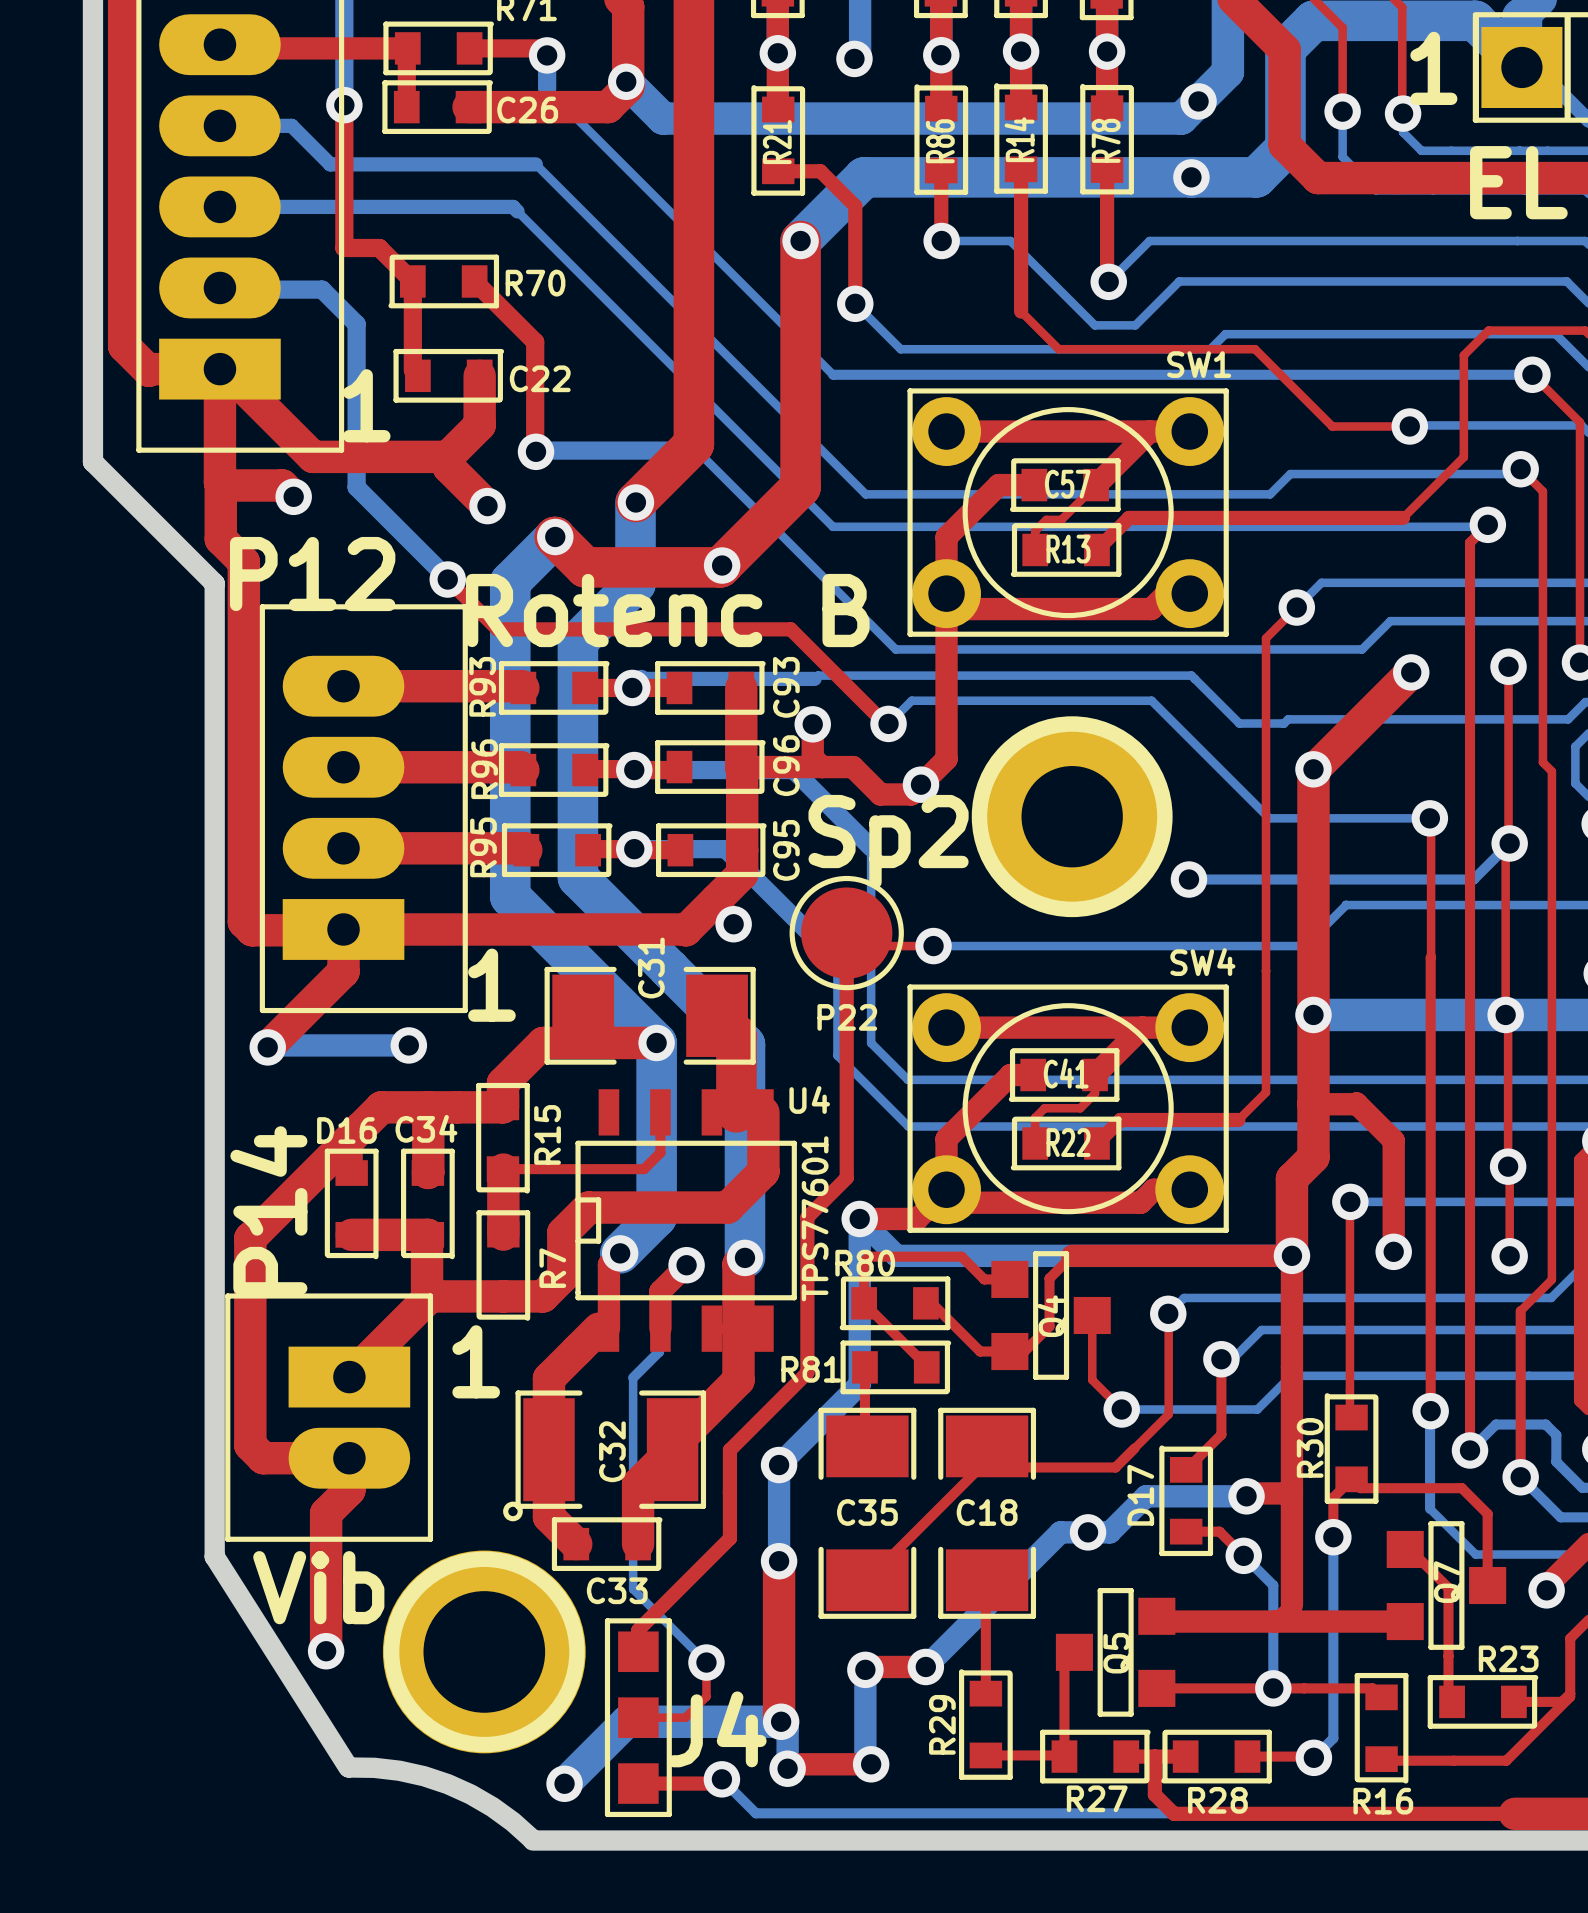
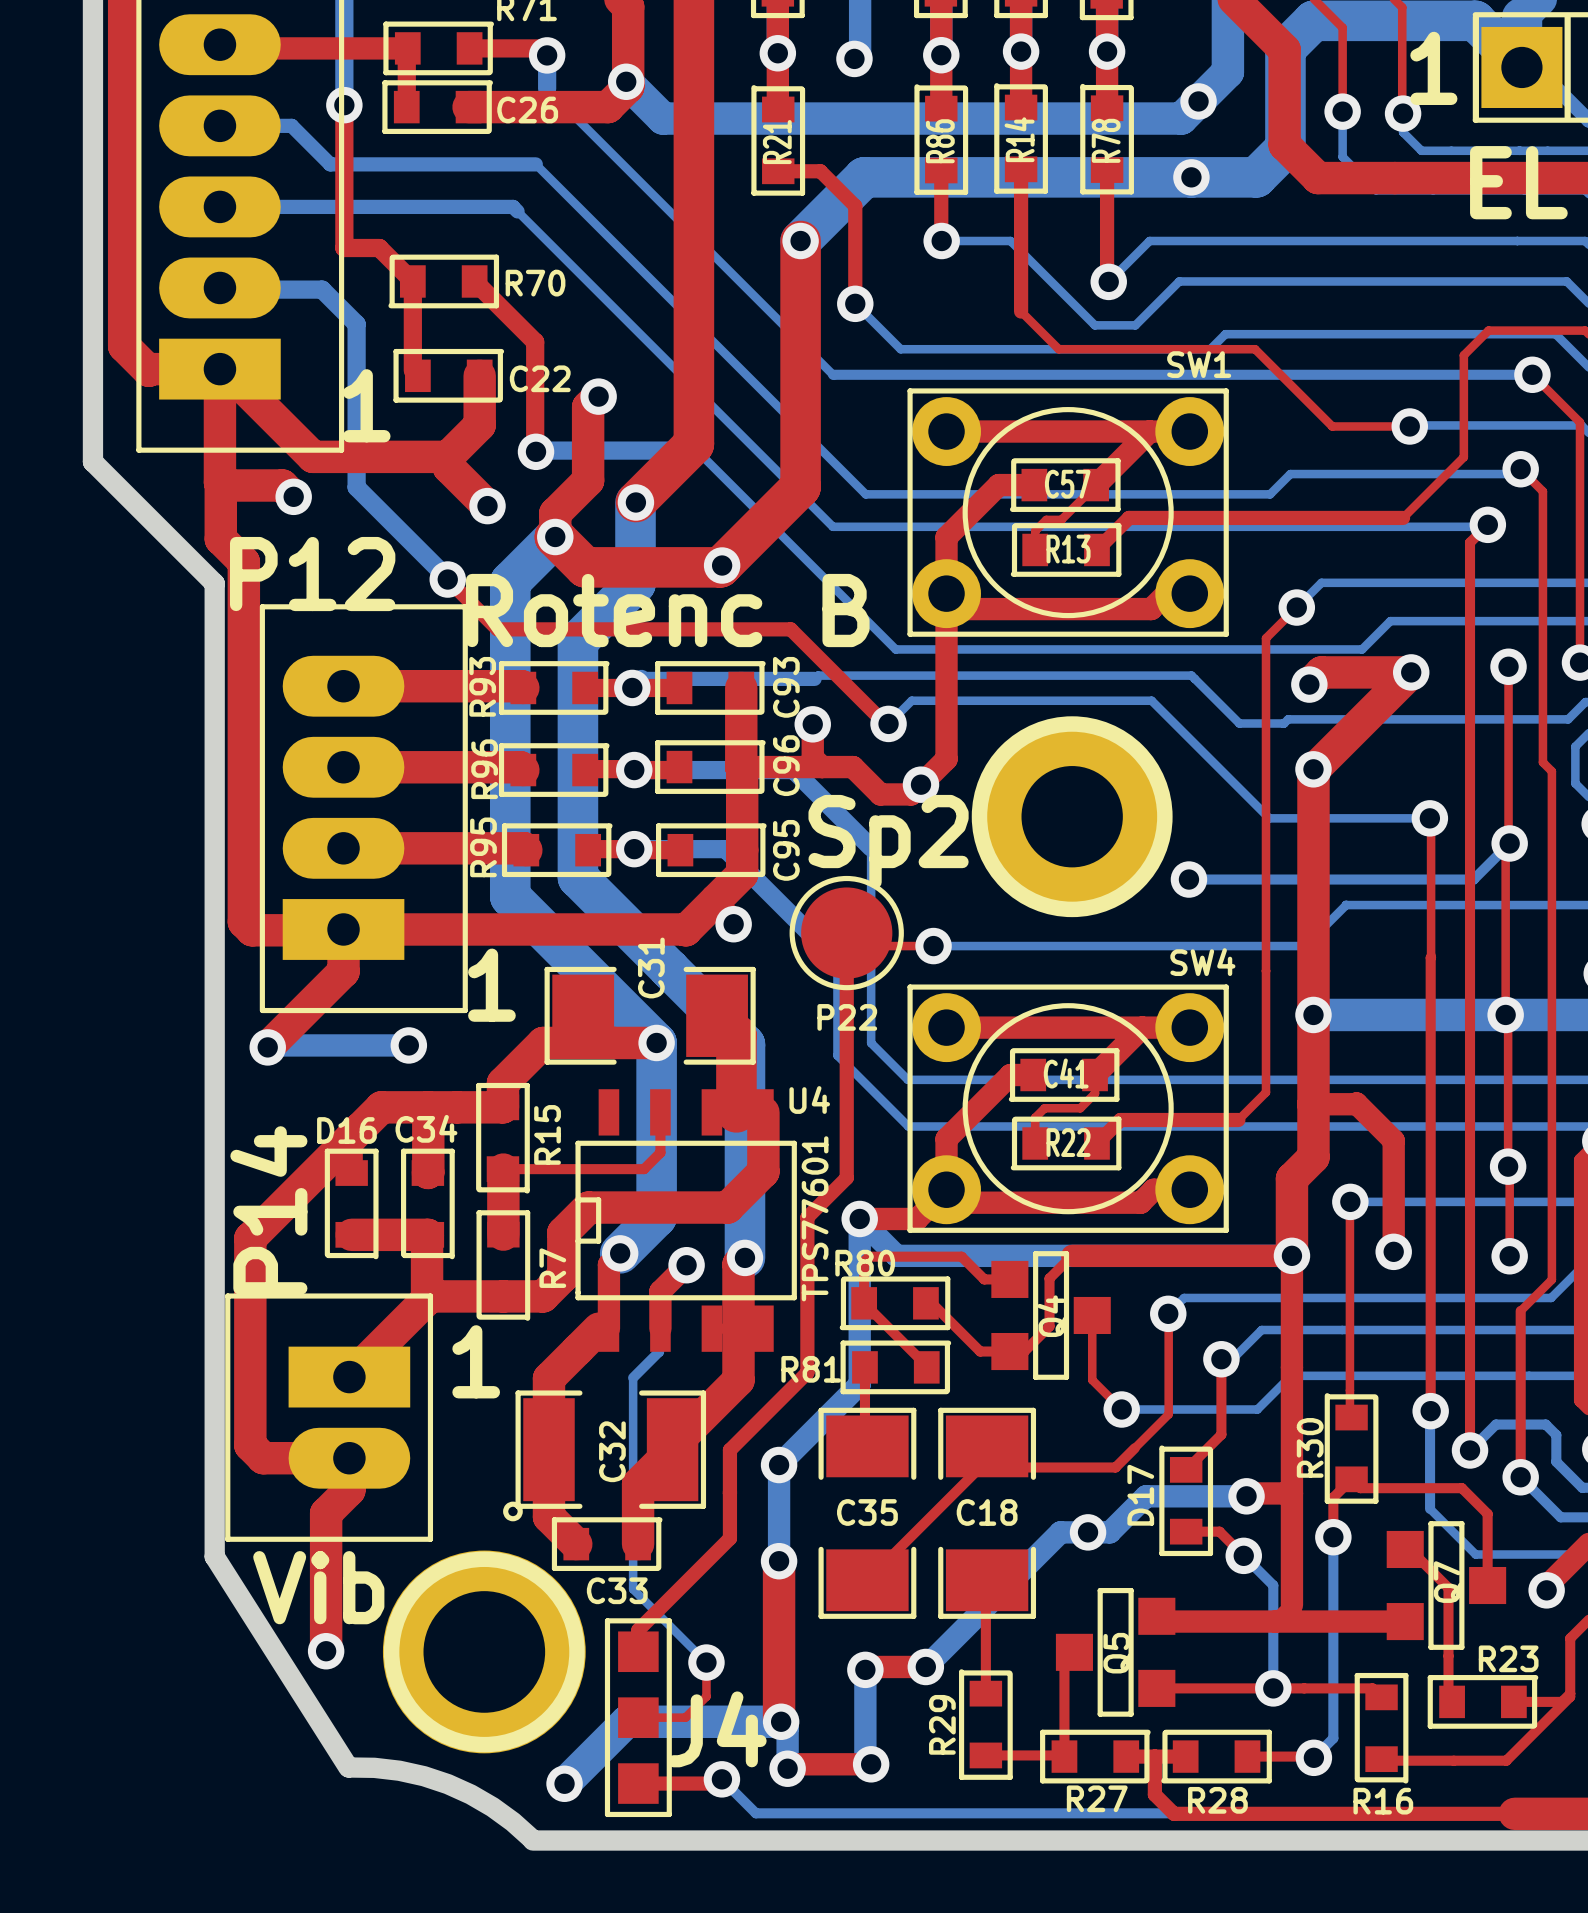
top track: none -> (598, 396) (588, 407) (588, 480) (555, 513) (555, 536)
via: none -> (598, 396)
top track: none -> (1411, 672) (1321, 672) (1309, 684)
via: none -> (1309, 684)

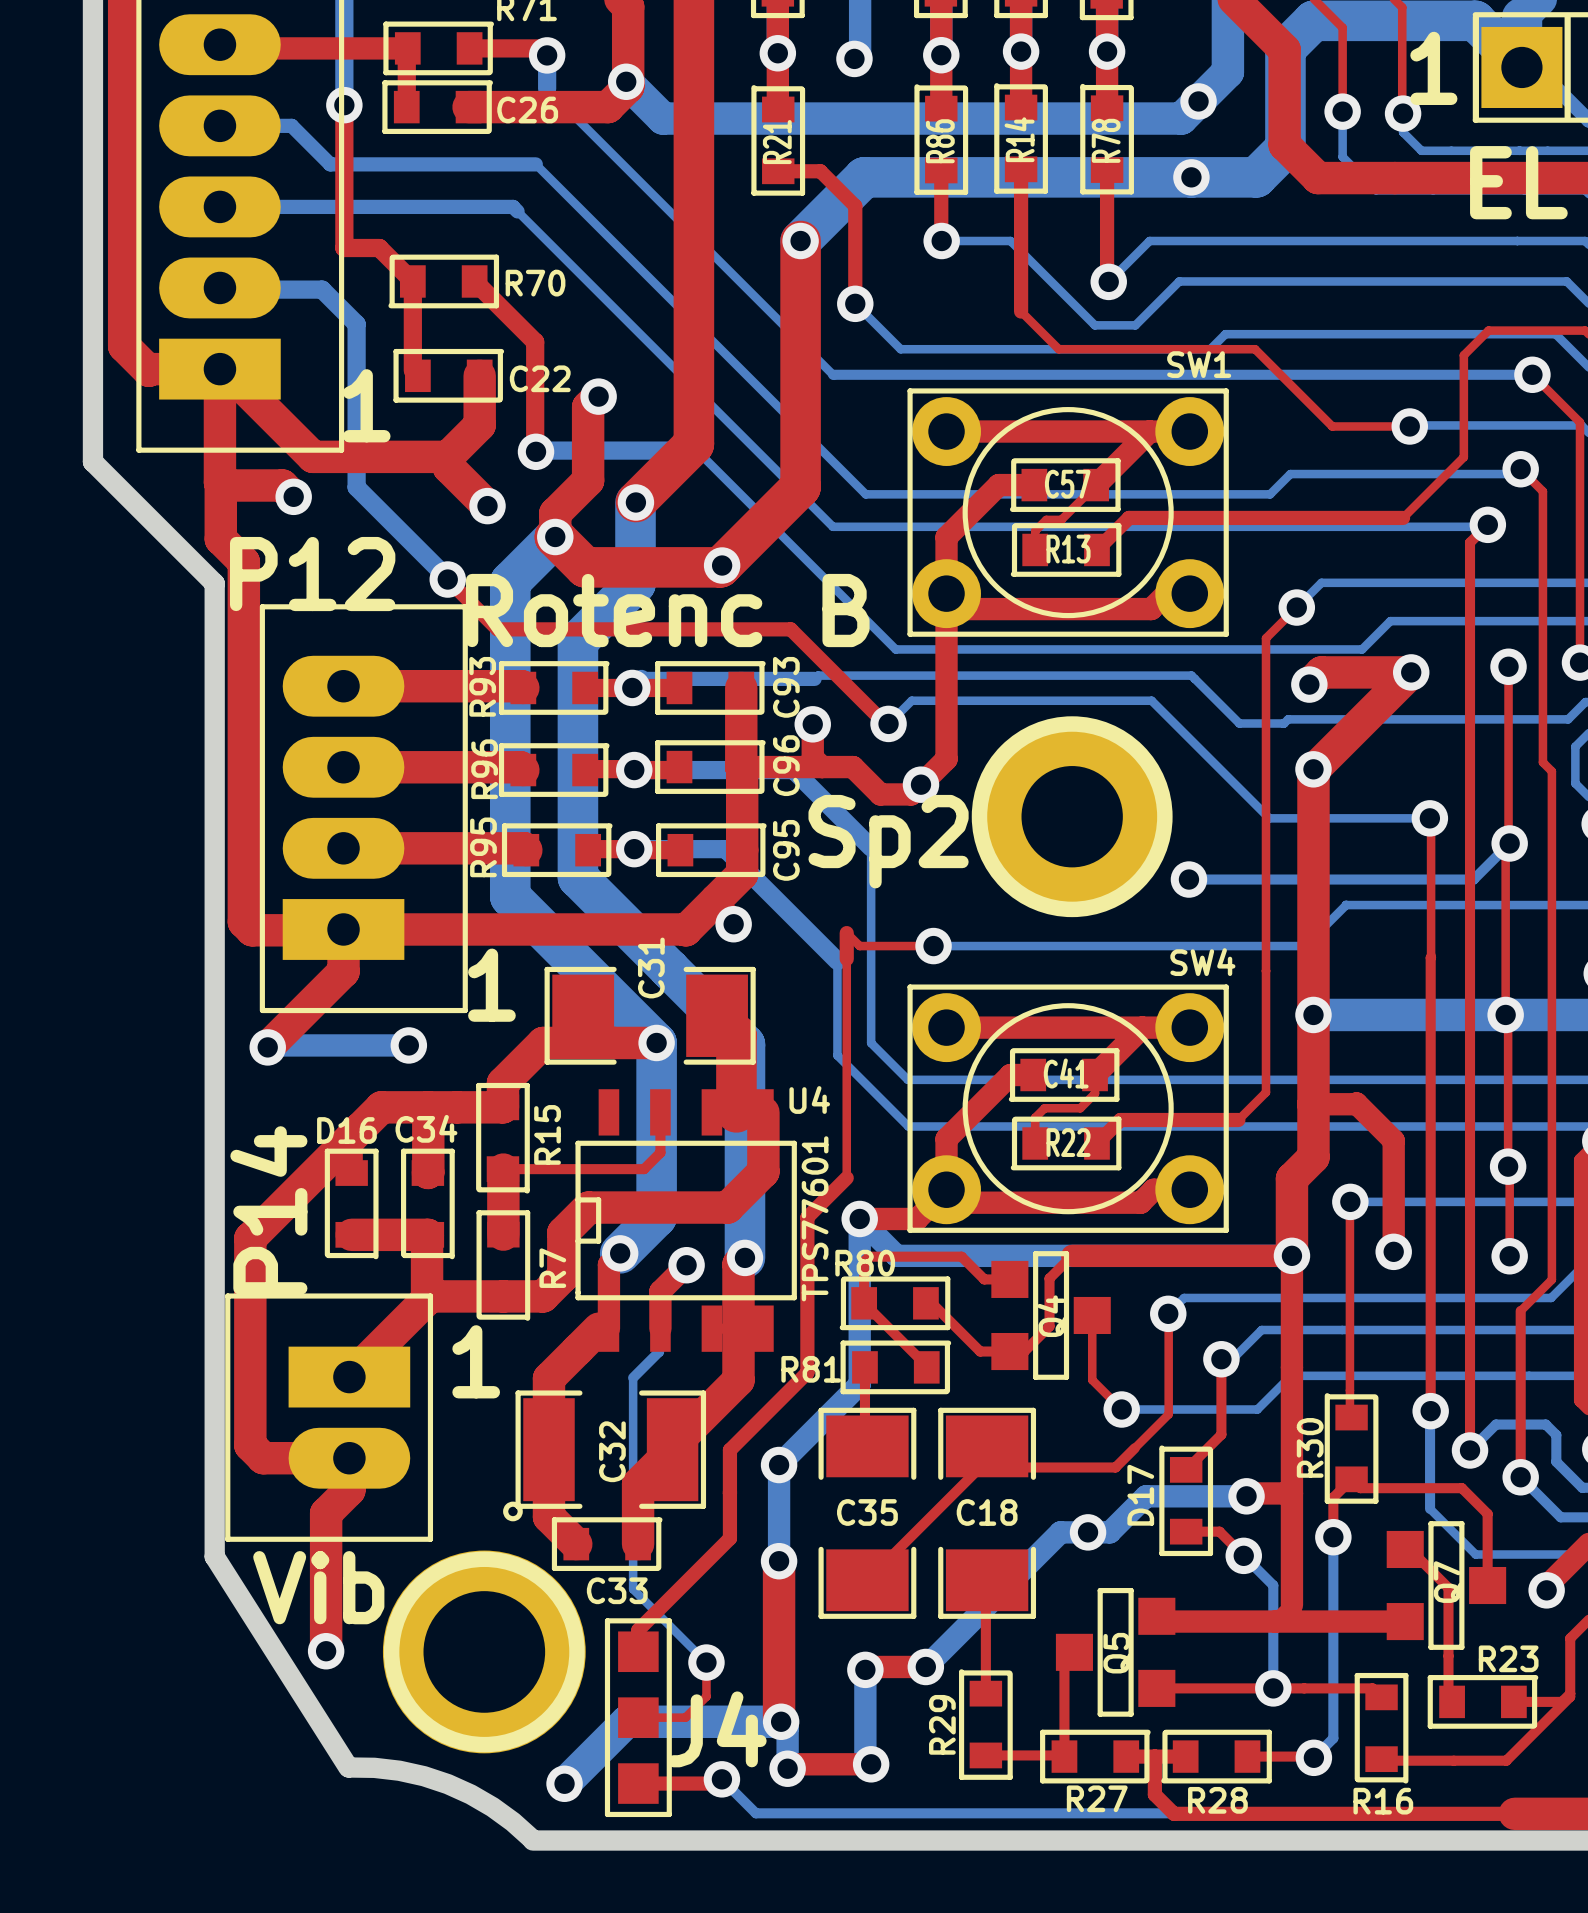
P22: (846, 933) -> none
top track width: thick (846, 959) (846, 1177) -> thin (846, 959) (846, 1177)

